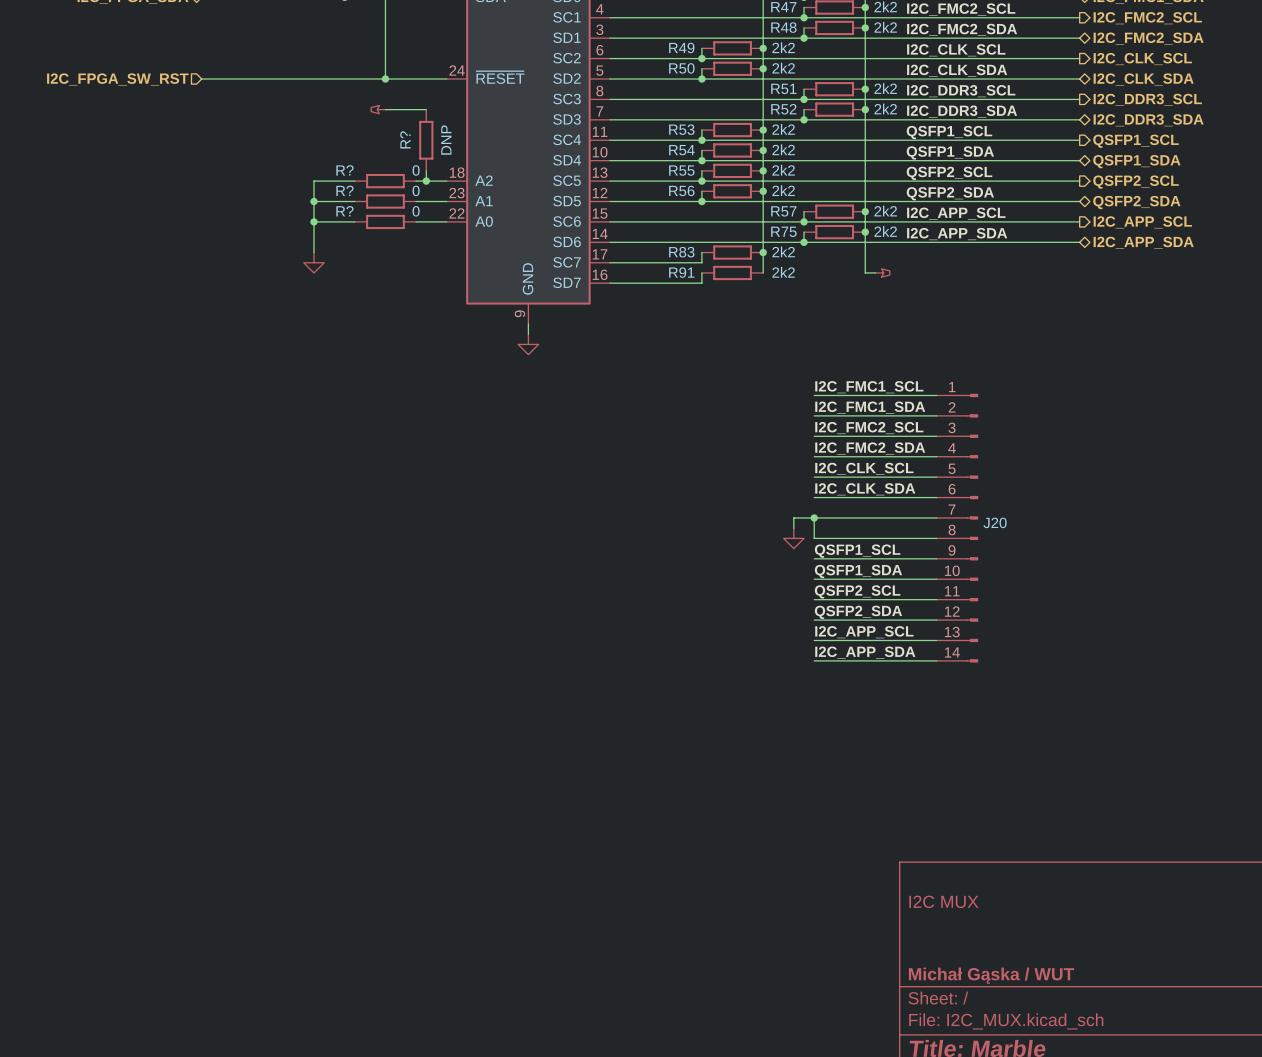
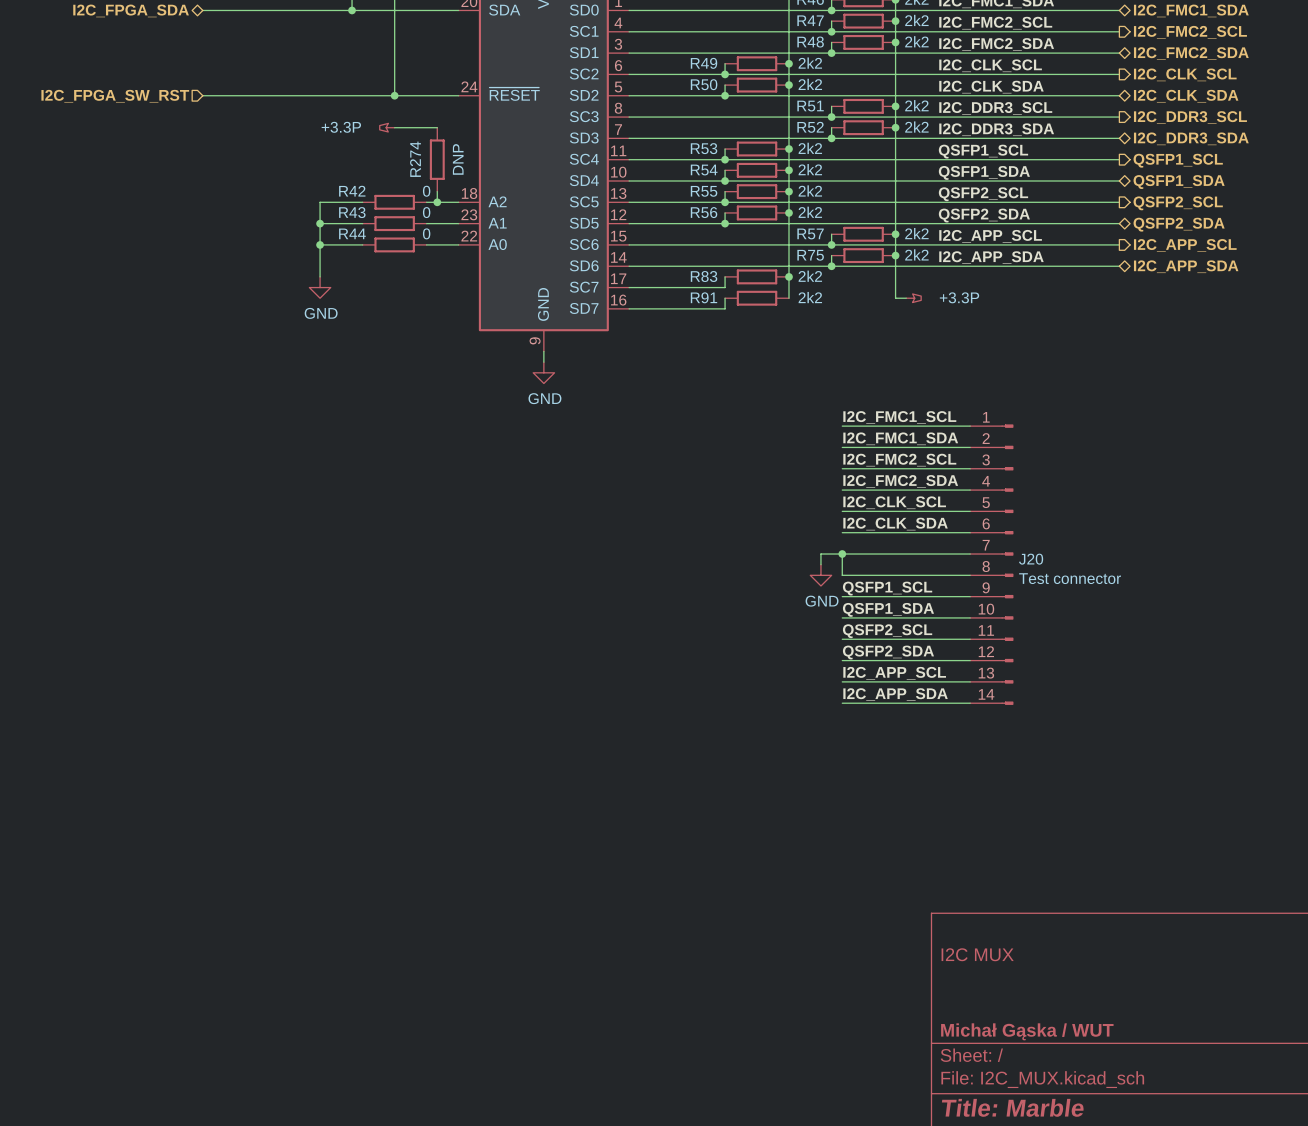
power symbol text: none -> +3.3P (341, 127)
R? name: R? (405, 139) -> R274 (415, 159)
R? name: R? (344, 170) -> R42 (352, 191)
R? name: R? (344, 190) -> R43 (352, 212)
R? name: R? (344, 211) -> R44 (352, 233)
power symbol text: none -> +3.3P (959, 297)
power symbol text: none -> GND (321, 313)
power symbol text: none -> GND (544, 398)
J20 value: none -> Test connector (1070, 578)
power symbol text: none -> GND (822, 601)

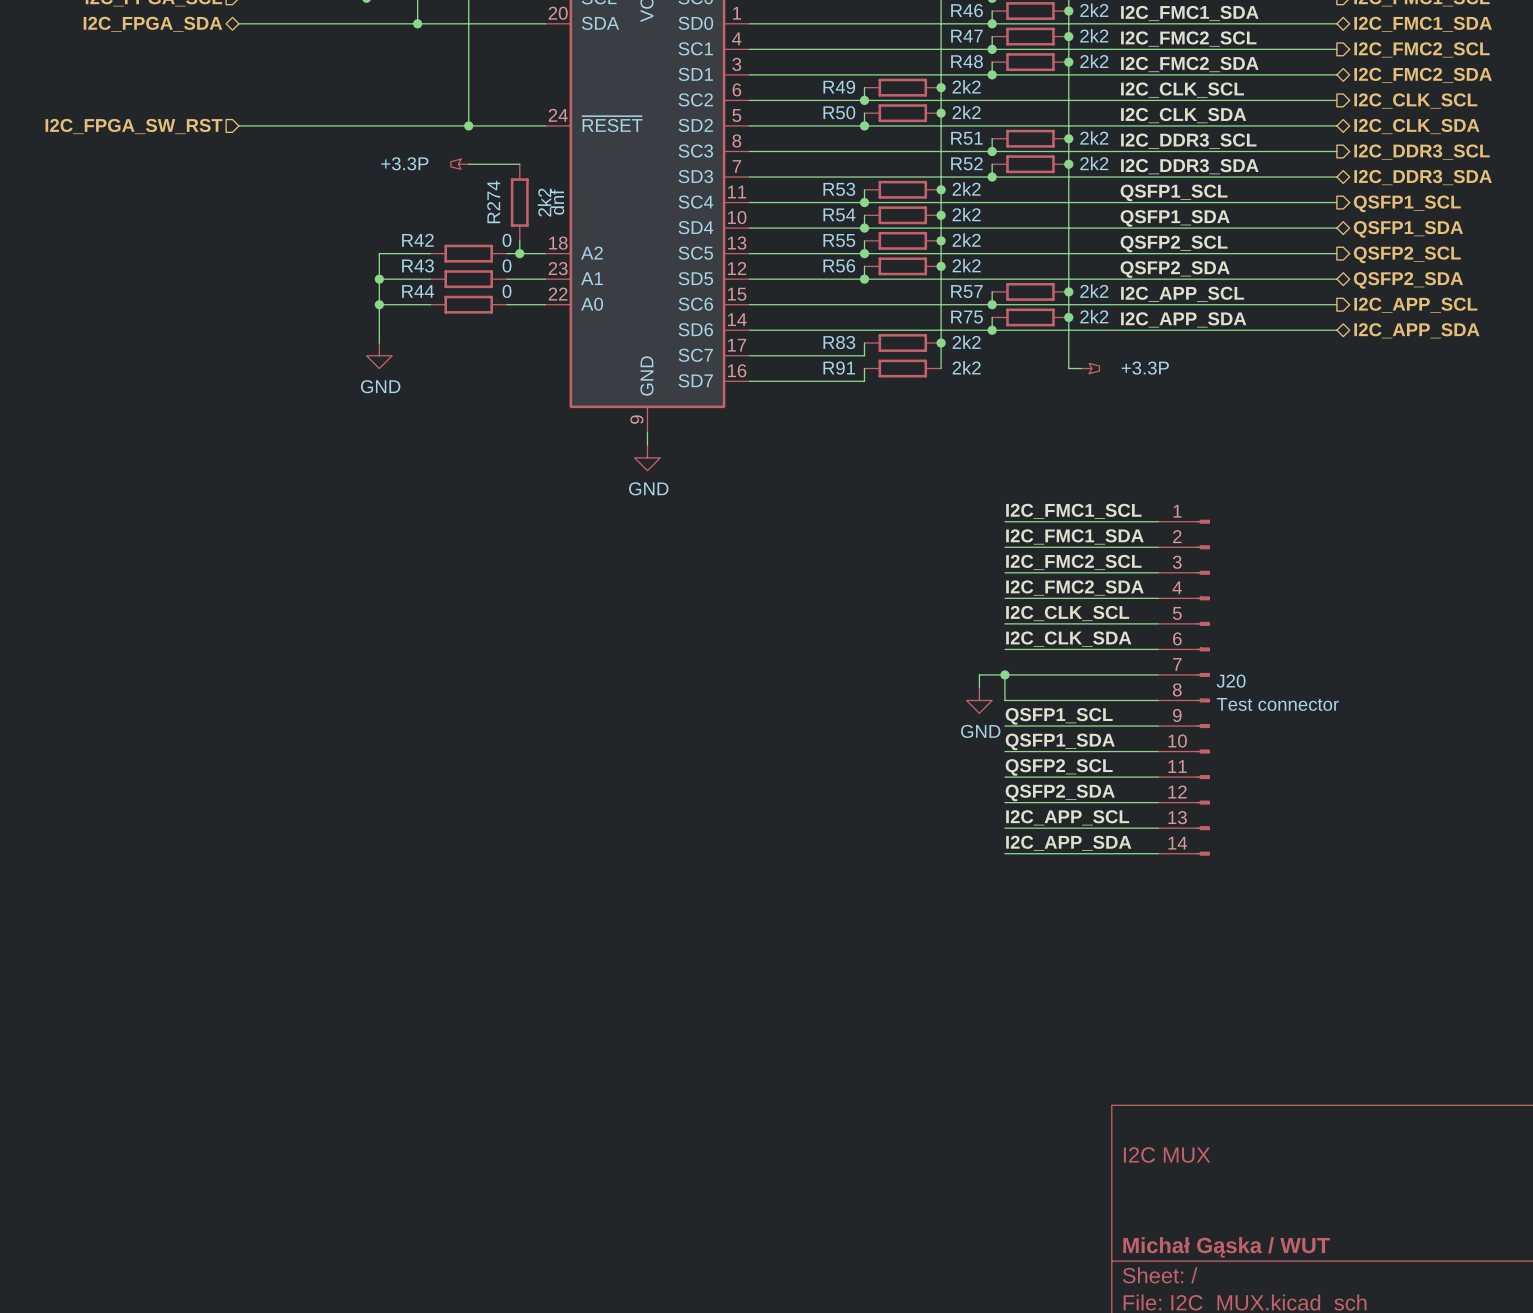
R274 text: DNP (458, 159) -> 2k2 (544, 202)
R274 text: none -> dnf (557, 202)

